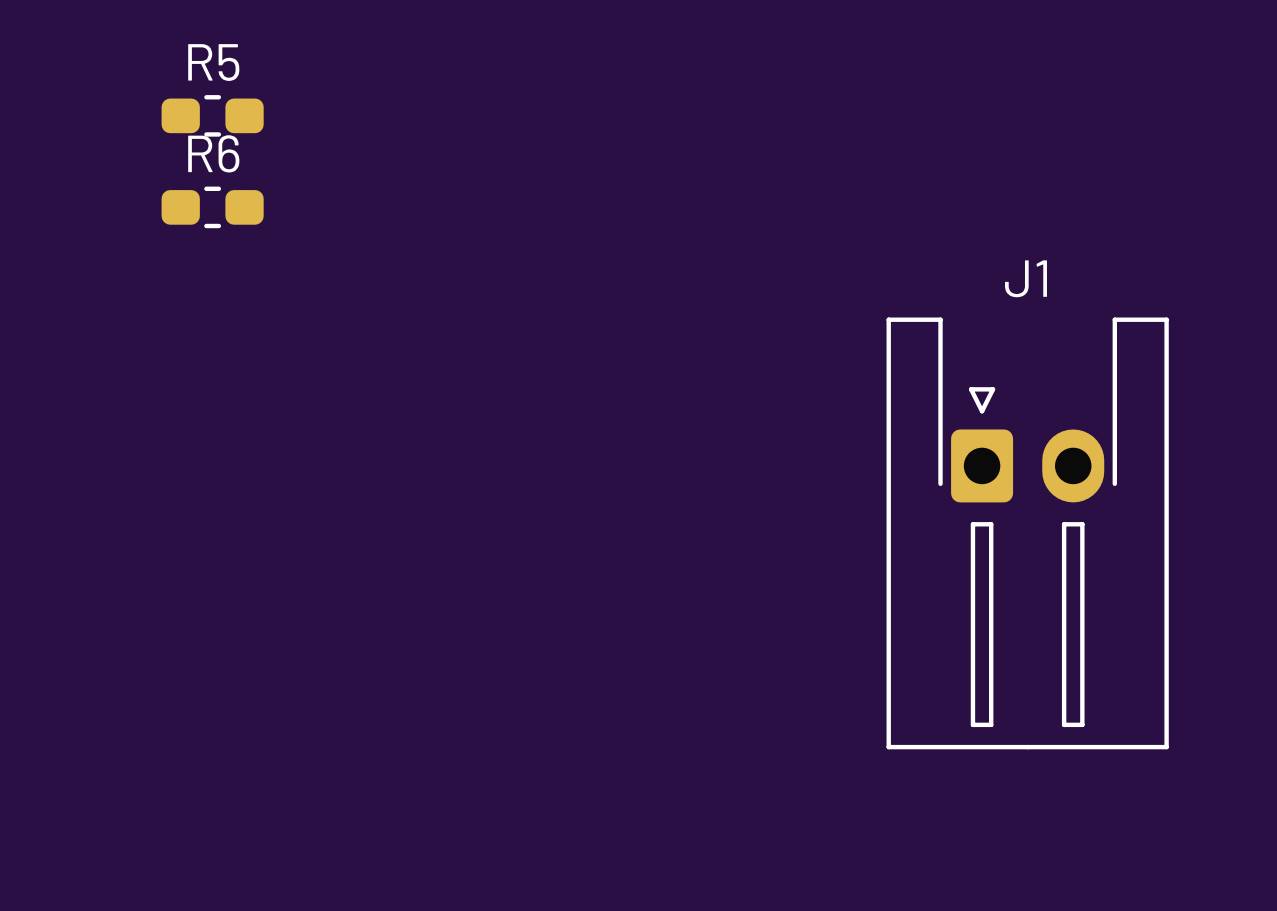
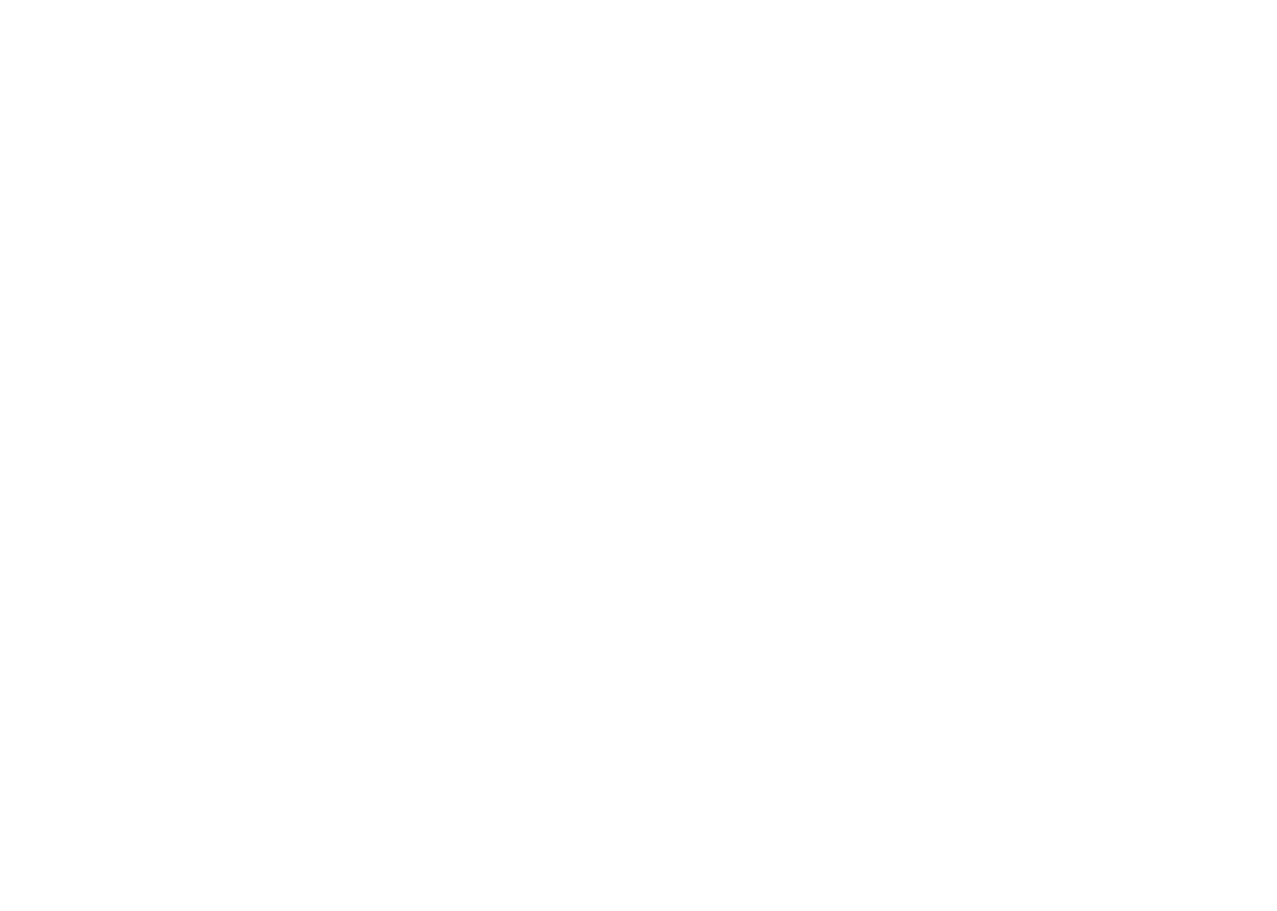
R5: (212, 115) -> none
R6: (212, 207) -> none
J1: (1027, 533) -> none

